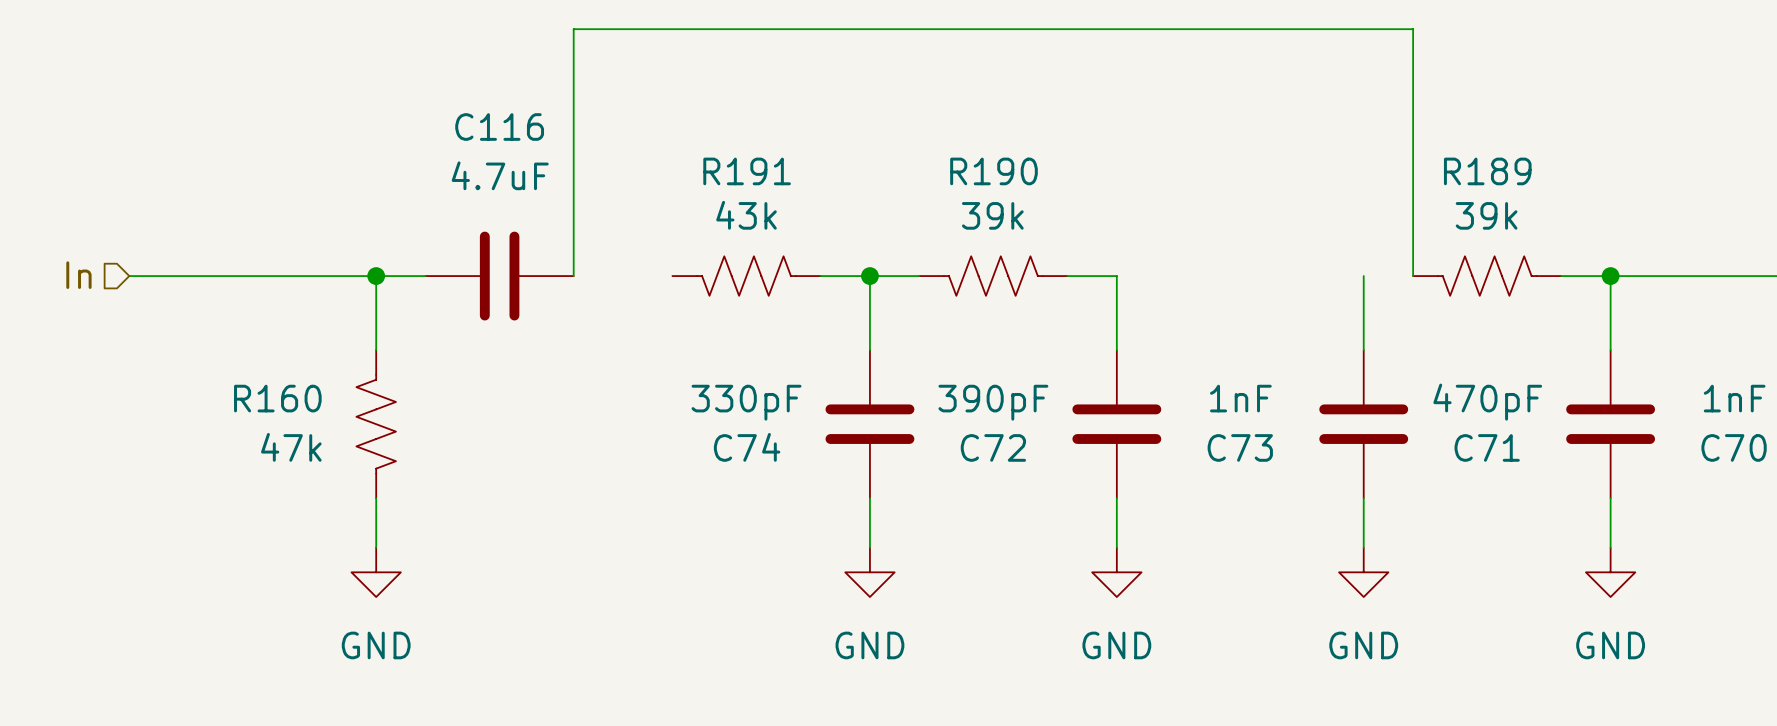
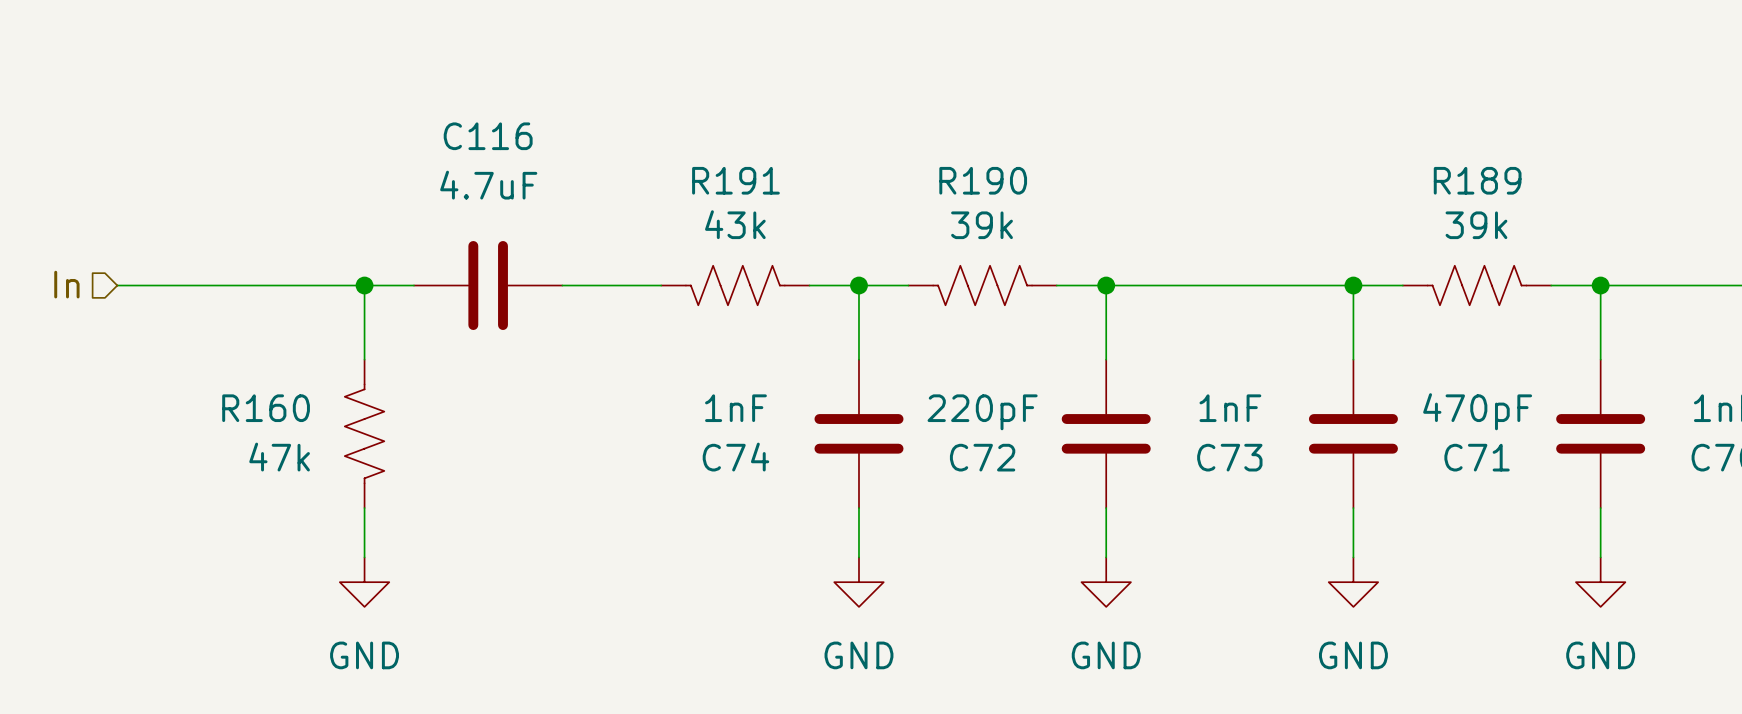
wire: (573, 276) (573, 29) (1413, 29) (1413, 276) -> (1106, 285) (1402, 285)
wire: none -> (562, 285) (661, 285)
junction: none -> (1106, 285)
junction: none -> (1353, 285)
C74 value: 330pF (746, 402) -> 1nF (735, 408)
C72 value: 390pF (993, 402) -> 220pF (982, 412)

